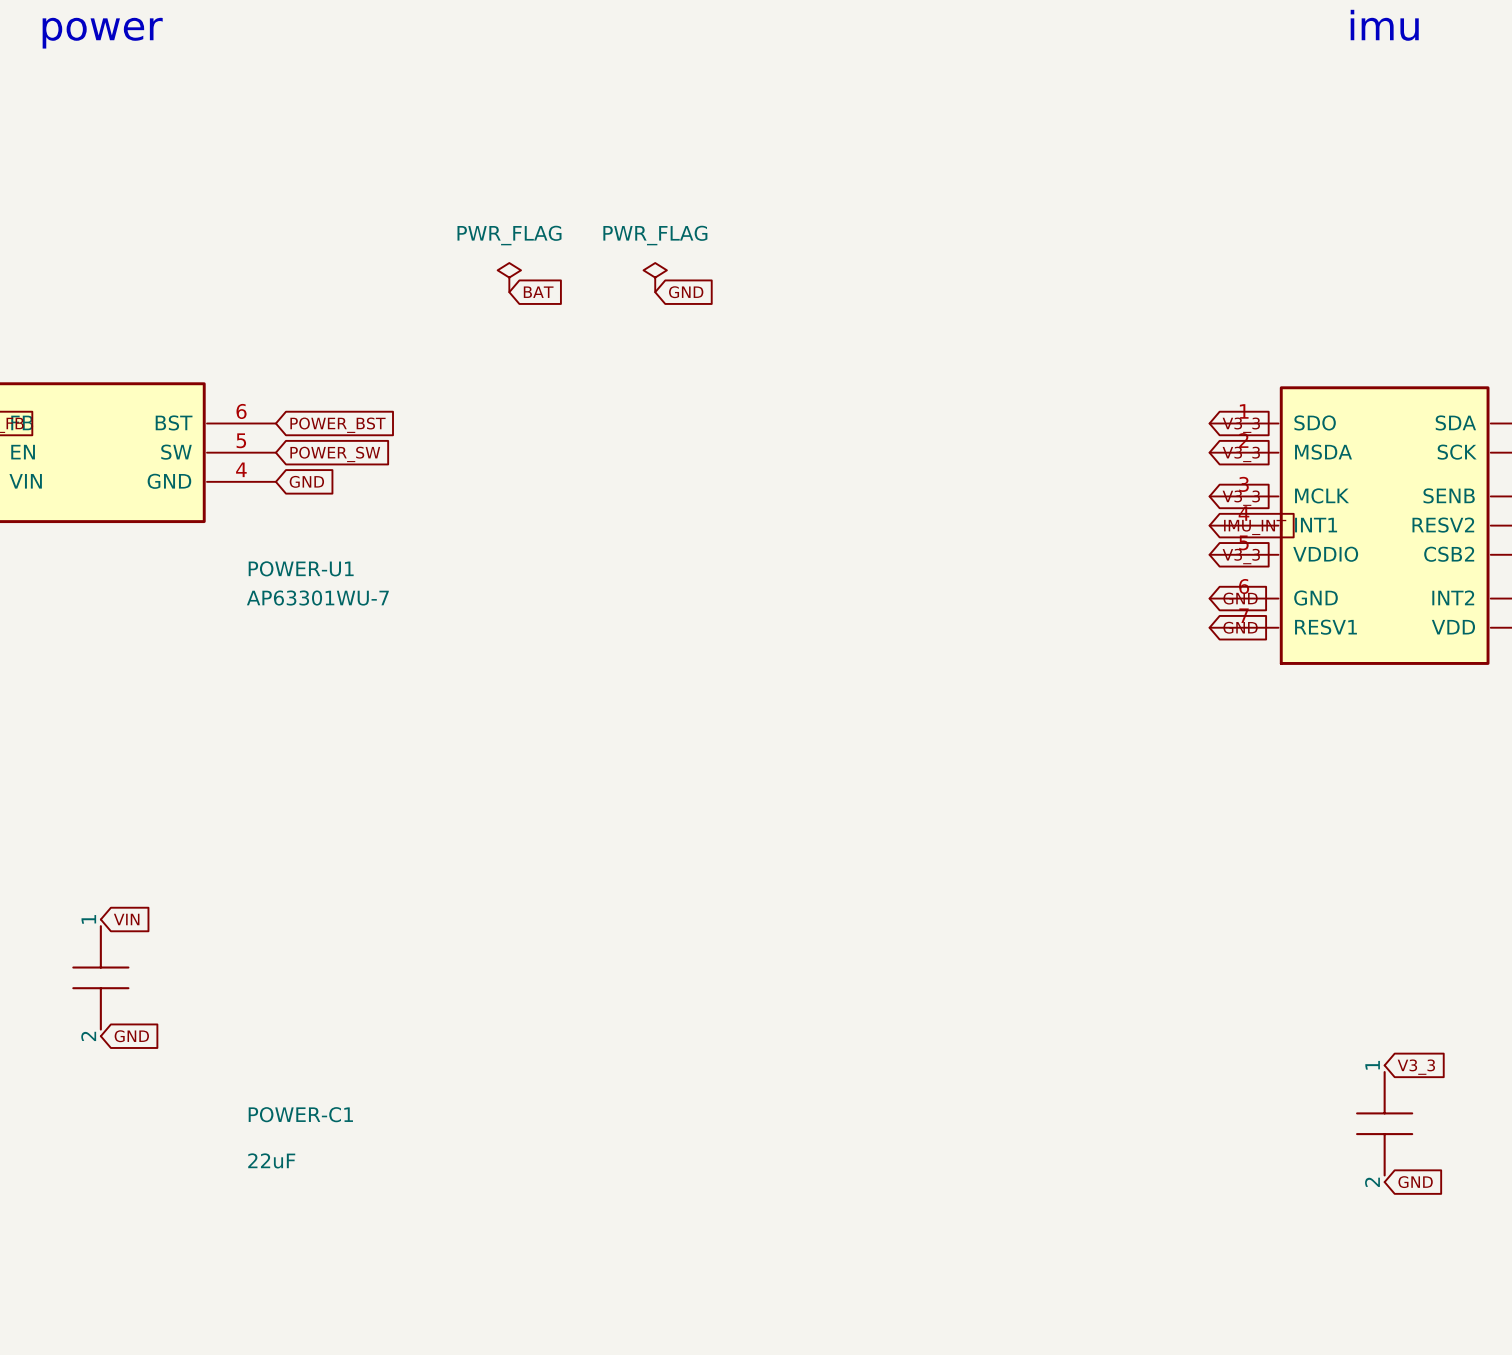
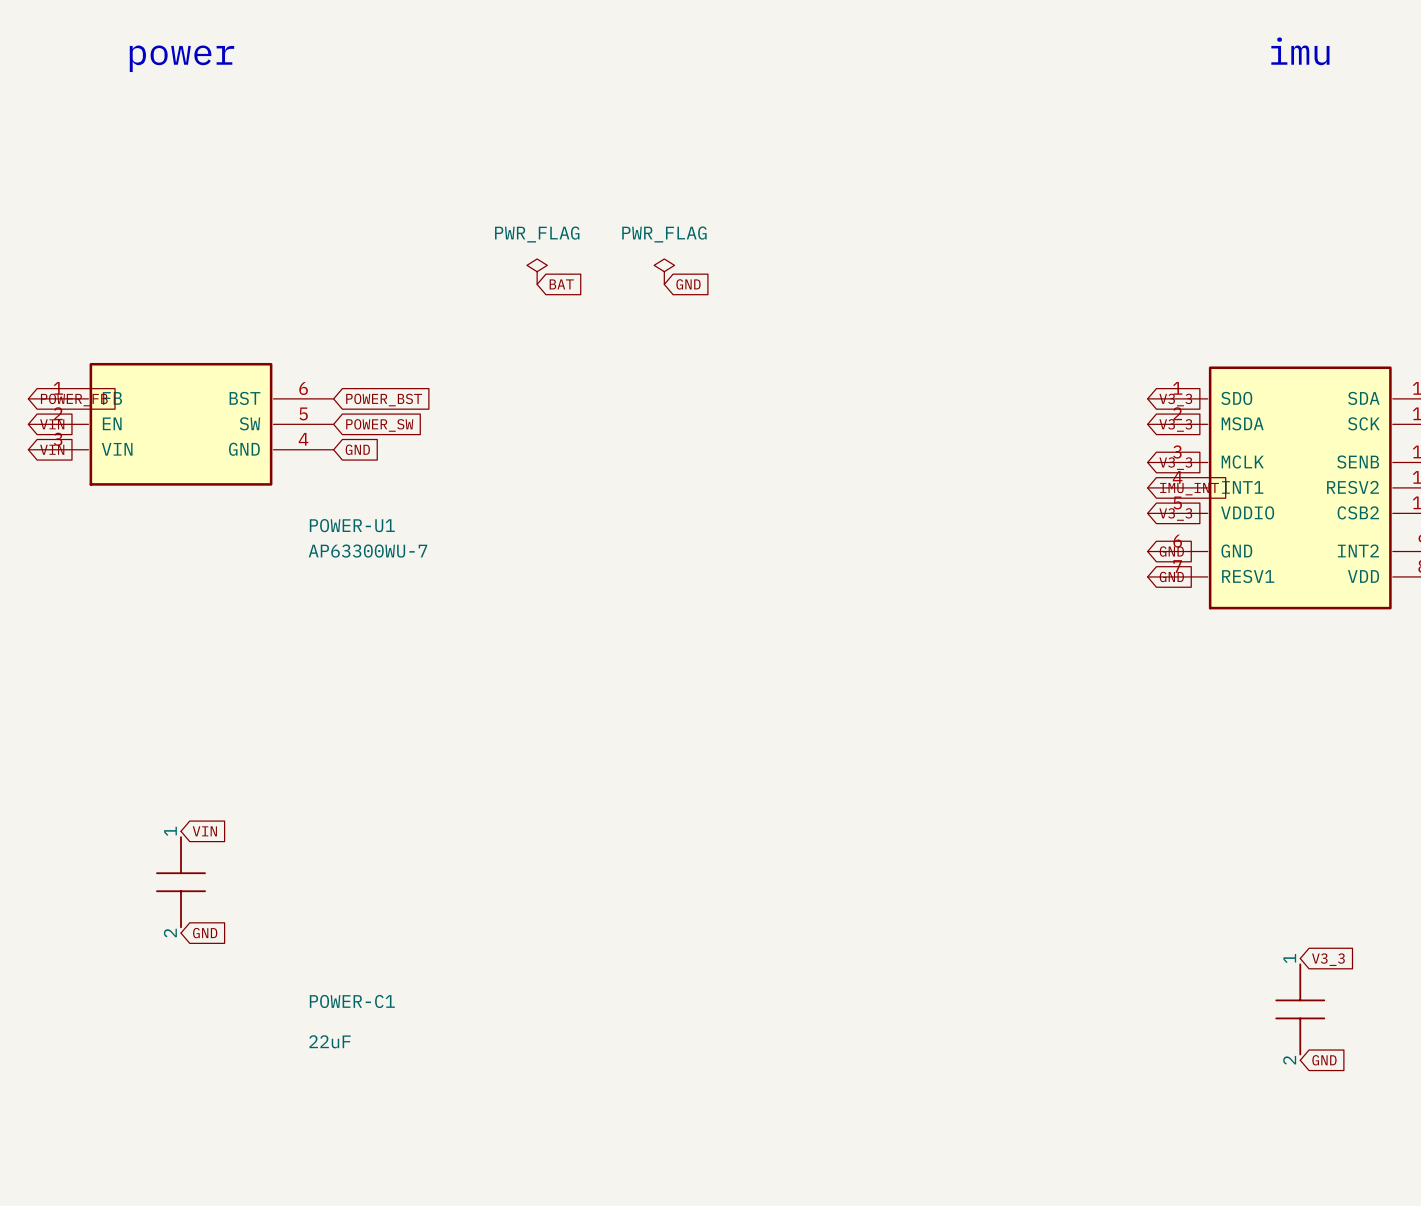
POWER-U1 value: AP63301WU-7 (317, 598) -> AP63300WU-7 (367, 551)

